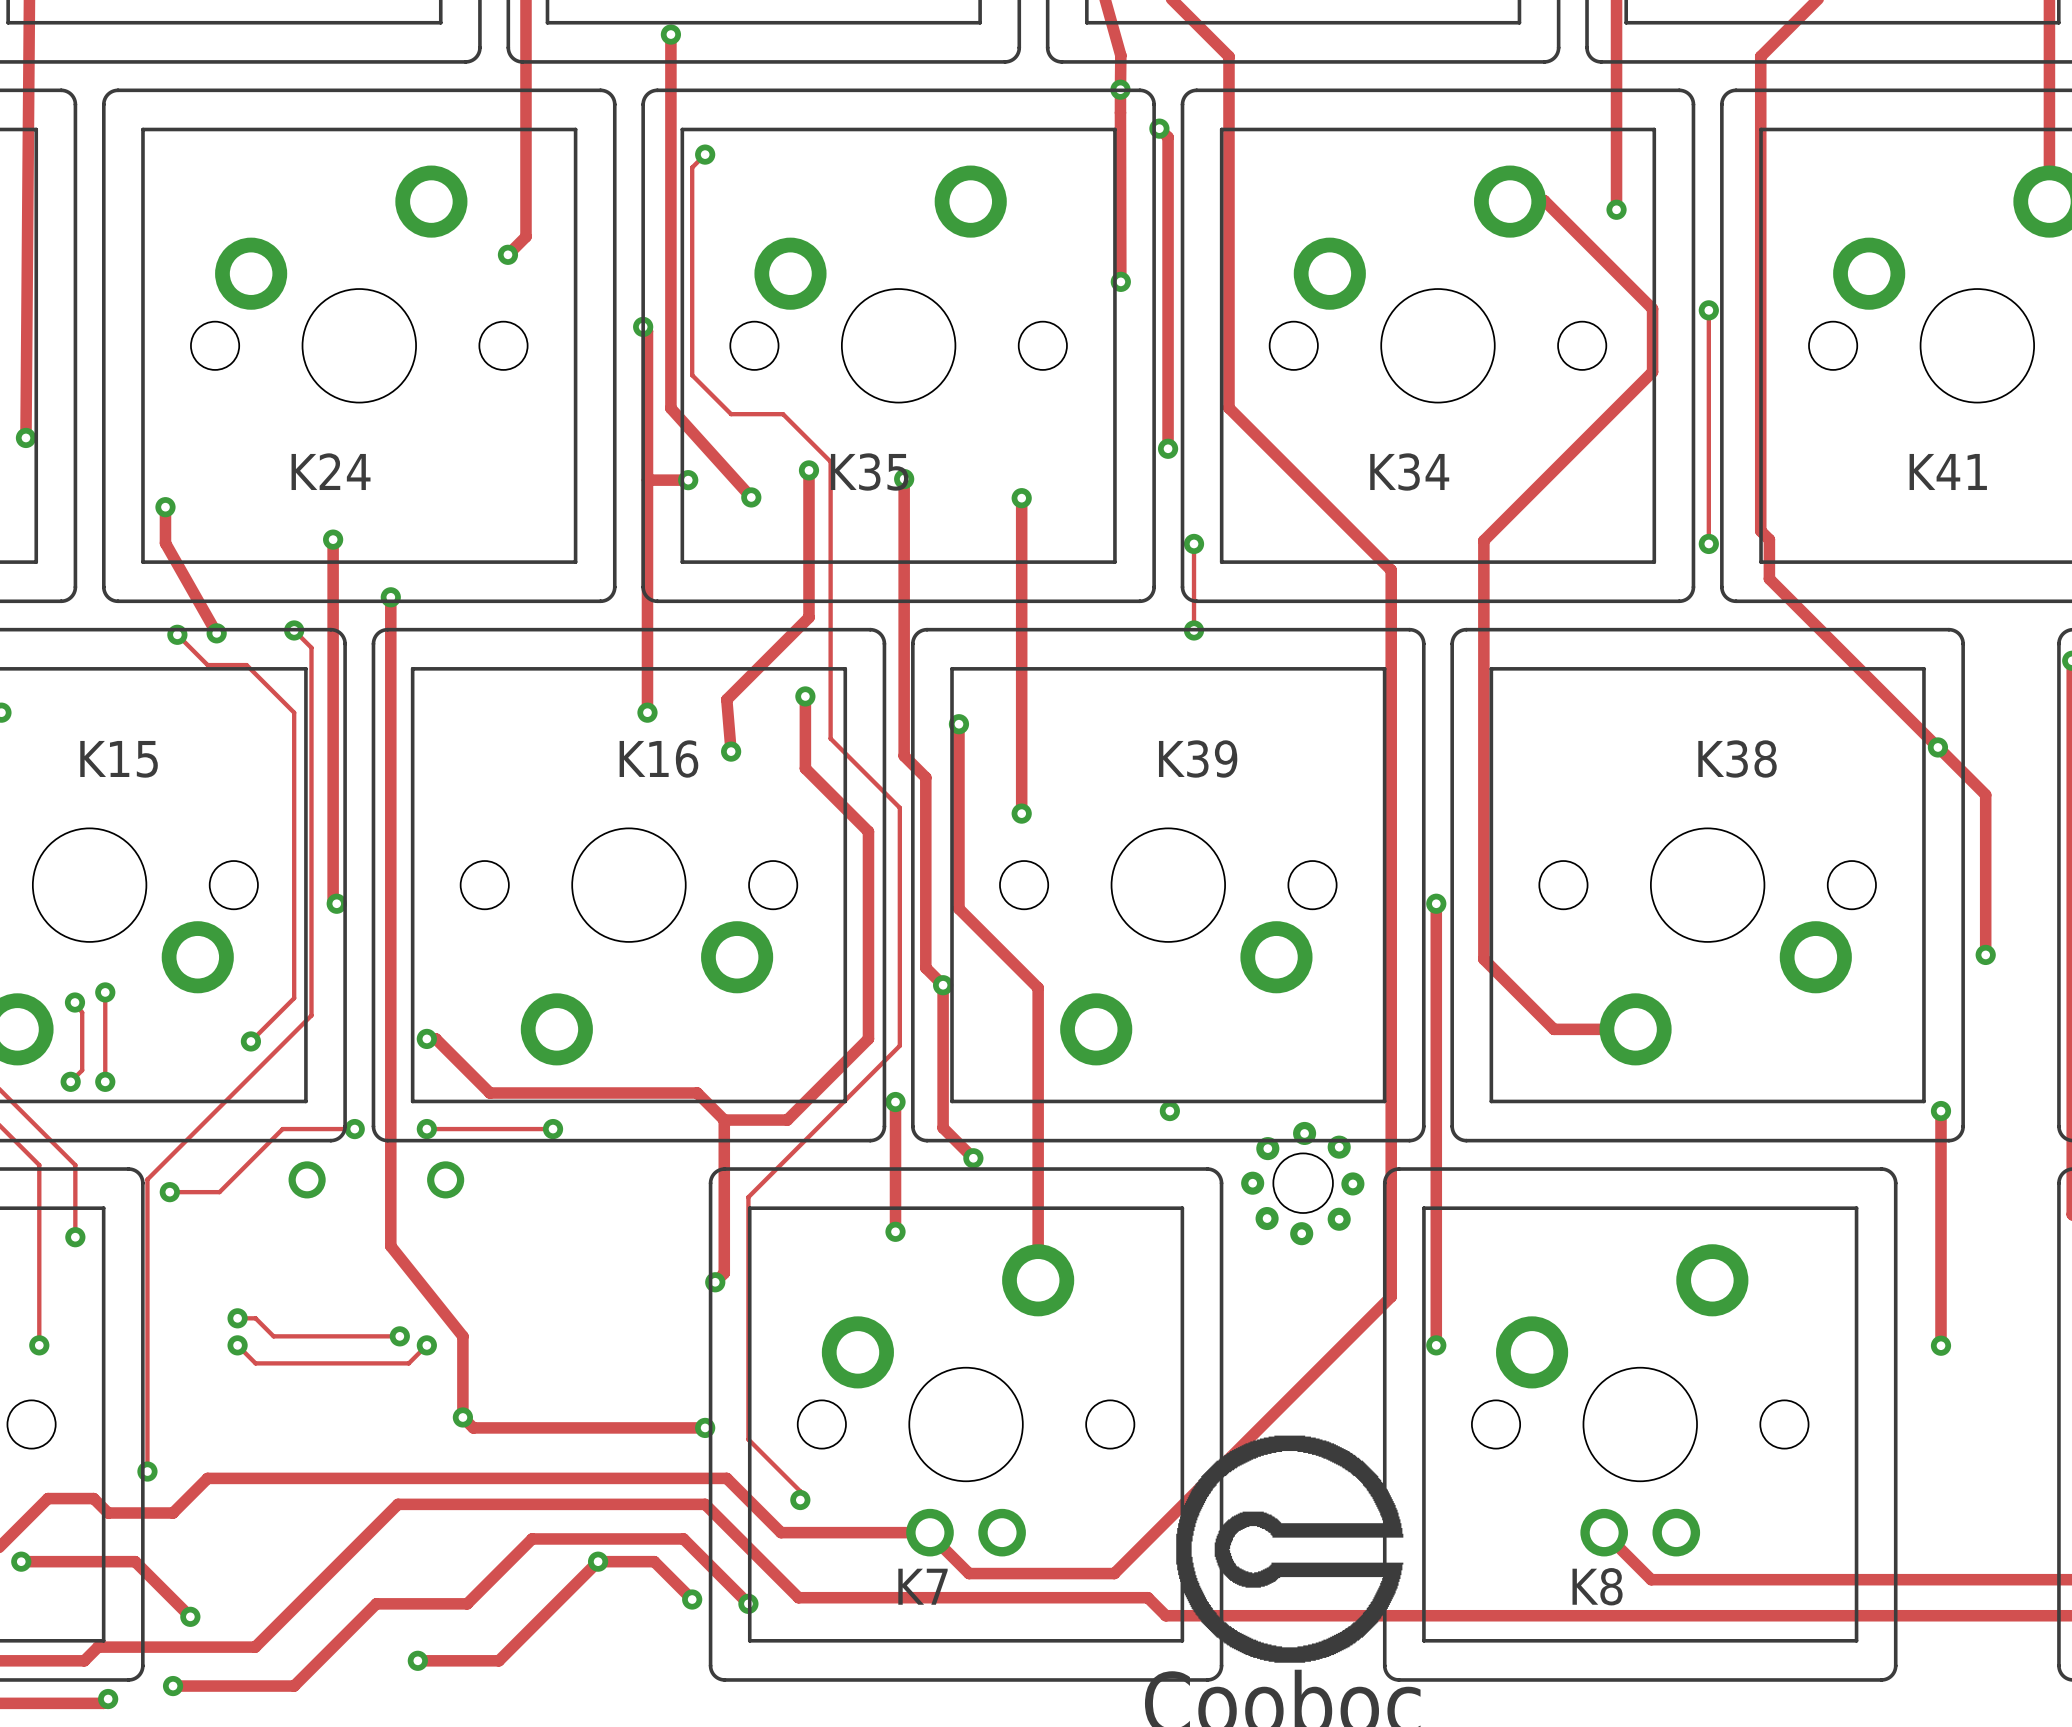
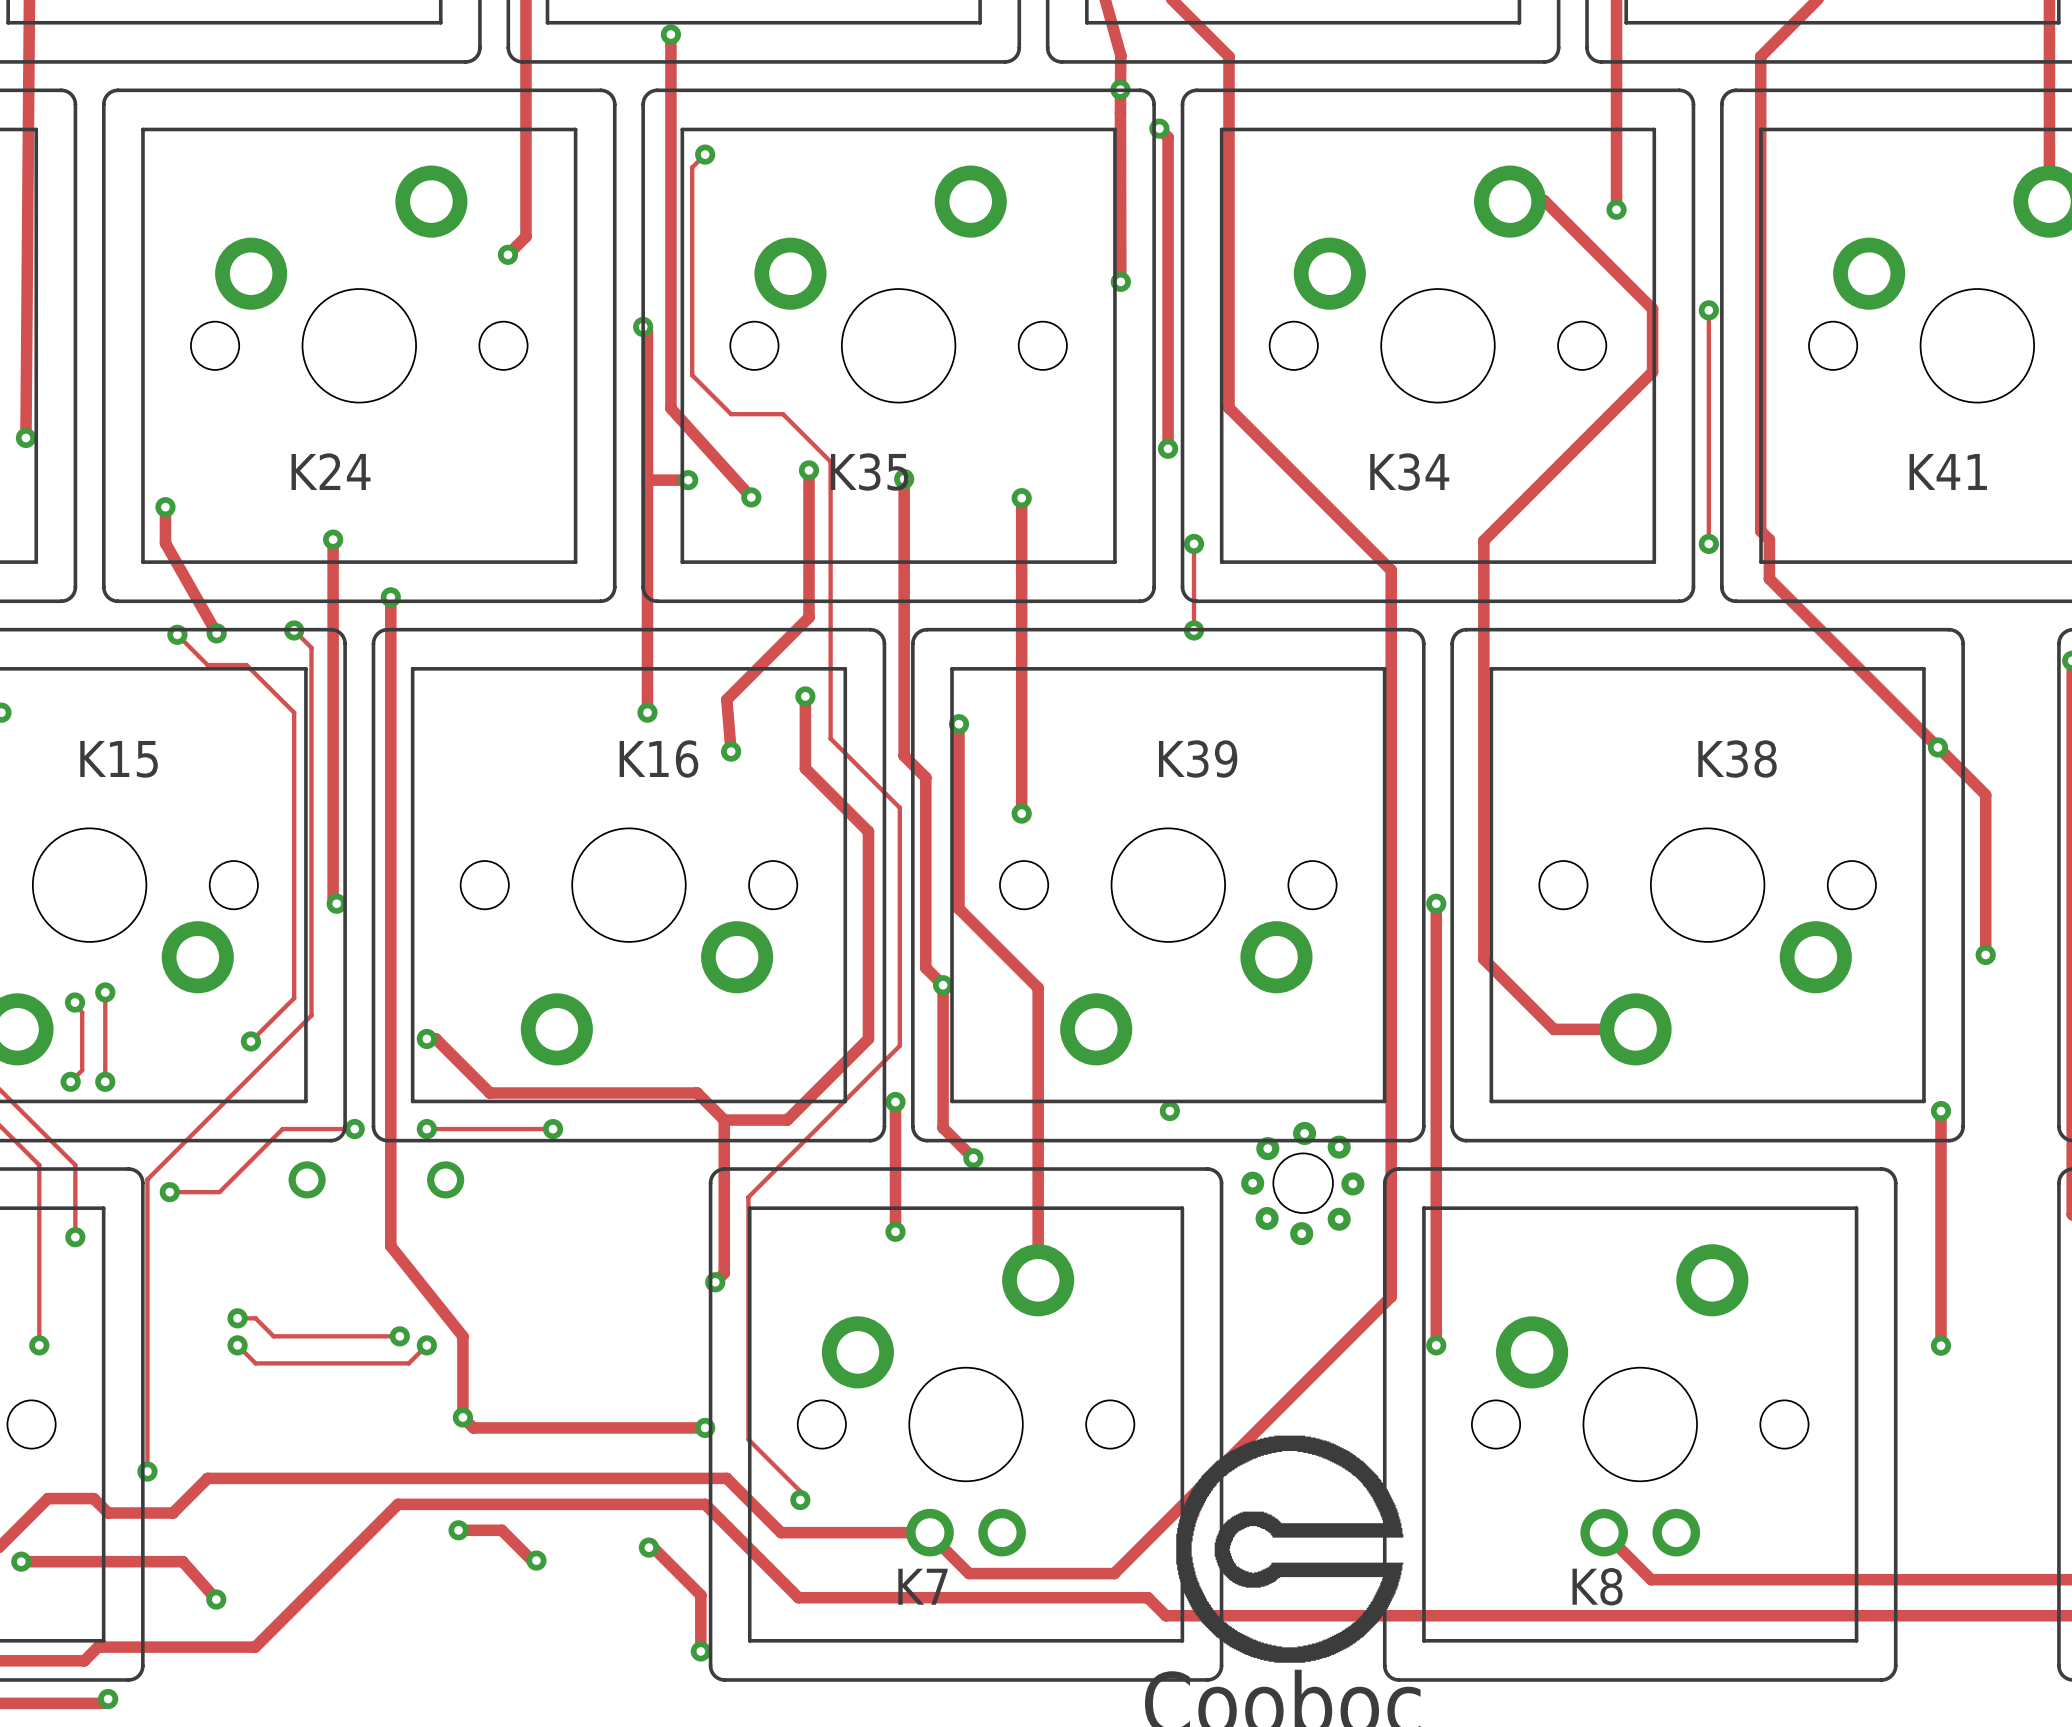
track: none -> (458, 1530) (501, 1530) (532, 1560) (536, 1560)
via: none -> (458, 1530)
track: none -> (648, 1547) (653, 1547) (700, 1595) (700, 1651)
via: none -> (648, 1547)
via: none -> (536, 1560)
track: (135, 1561) (190, 1616) -> (135, 1561) (182, 1561) (216, 1599)
via: (598, 1561) -> none
track: (692, 1599) (654, 1561) (598, 1561) (498, 1660) (417, 1660) -> none
via: (692, 1599) -> none
track: (748, 1603) (683, 1538) (532, 1538) (467, 1603) (376, 1603) (294, 1686) (173, 1686) -> none
via: (748, 1603) -> none
via position: (190, 1616) -> (216, 1599)
via: none -> (700, 1651)
via: (417, 1660) -> none
via: (173, 1686) -> none

